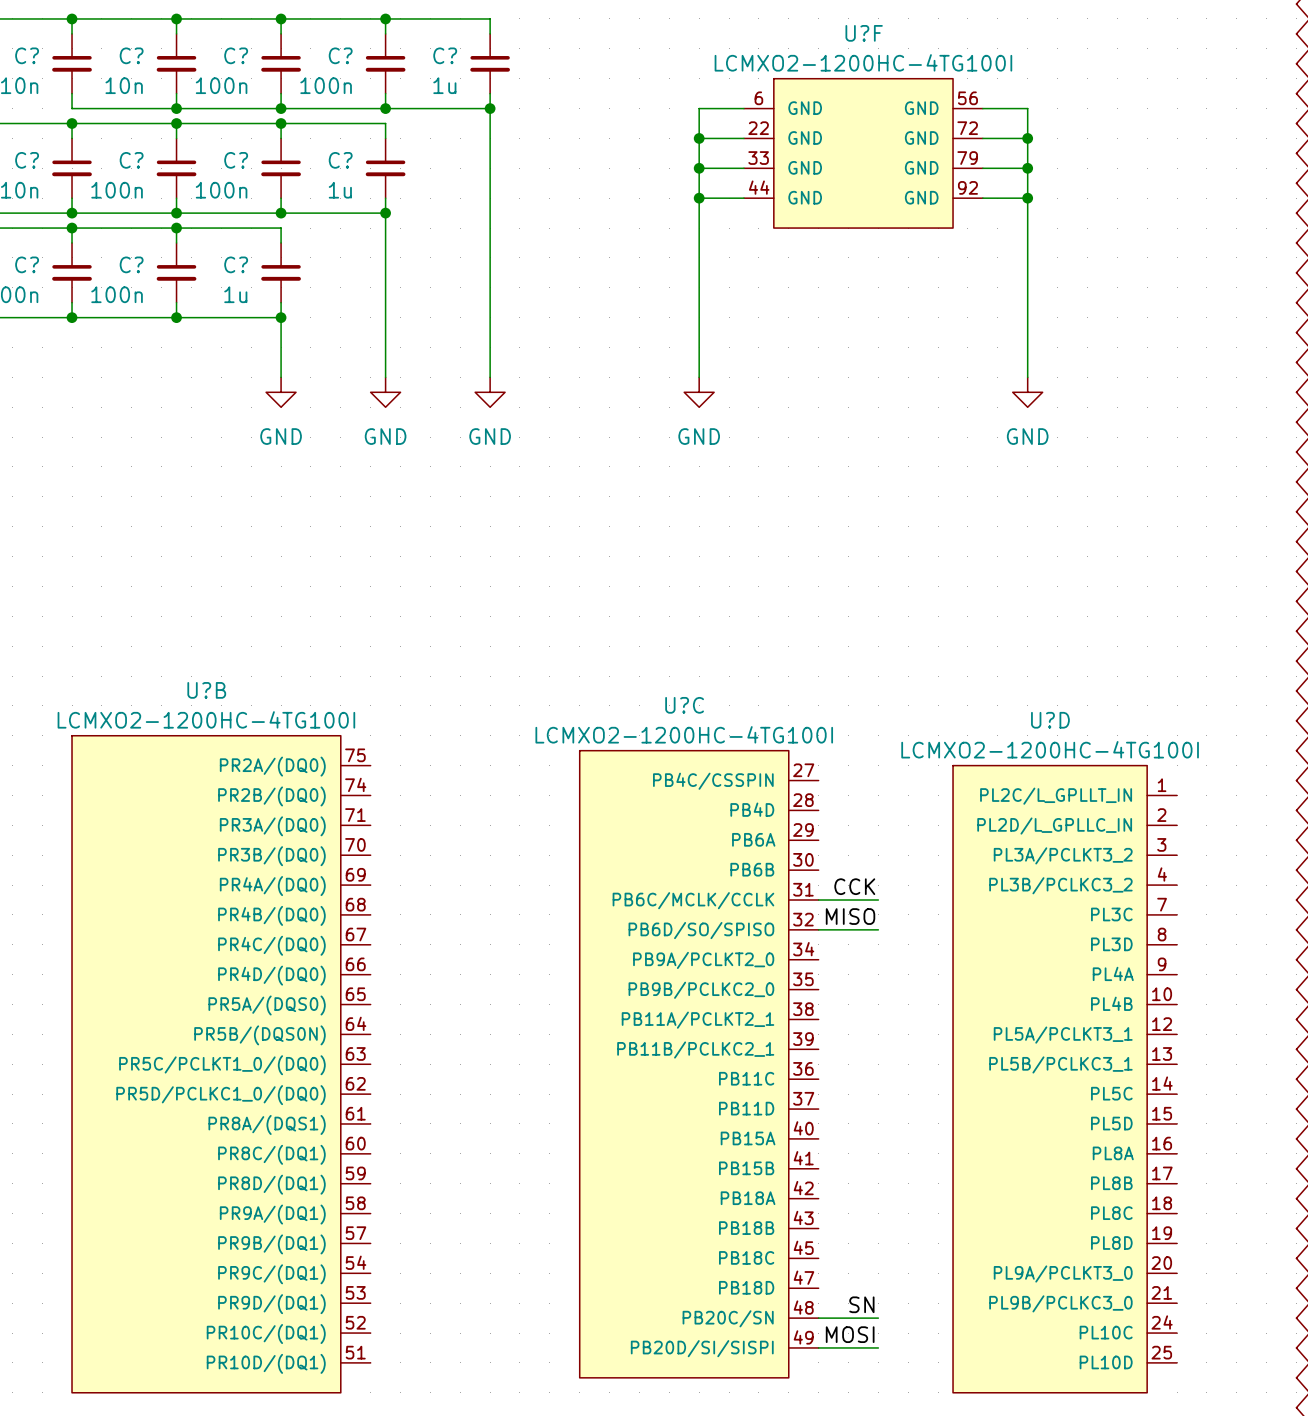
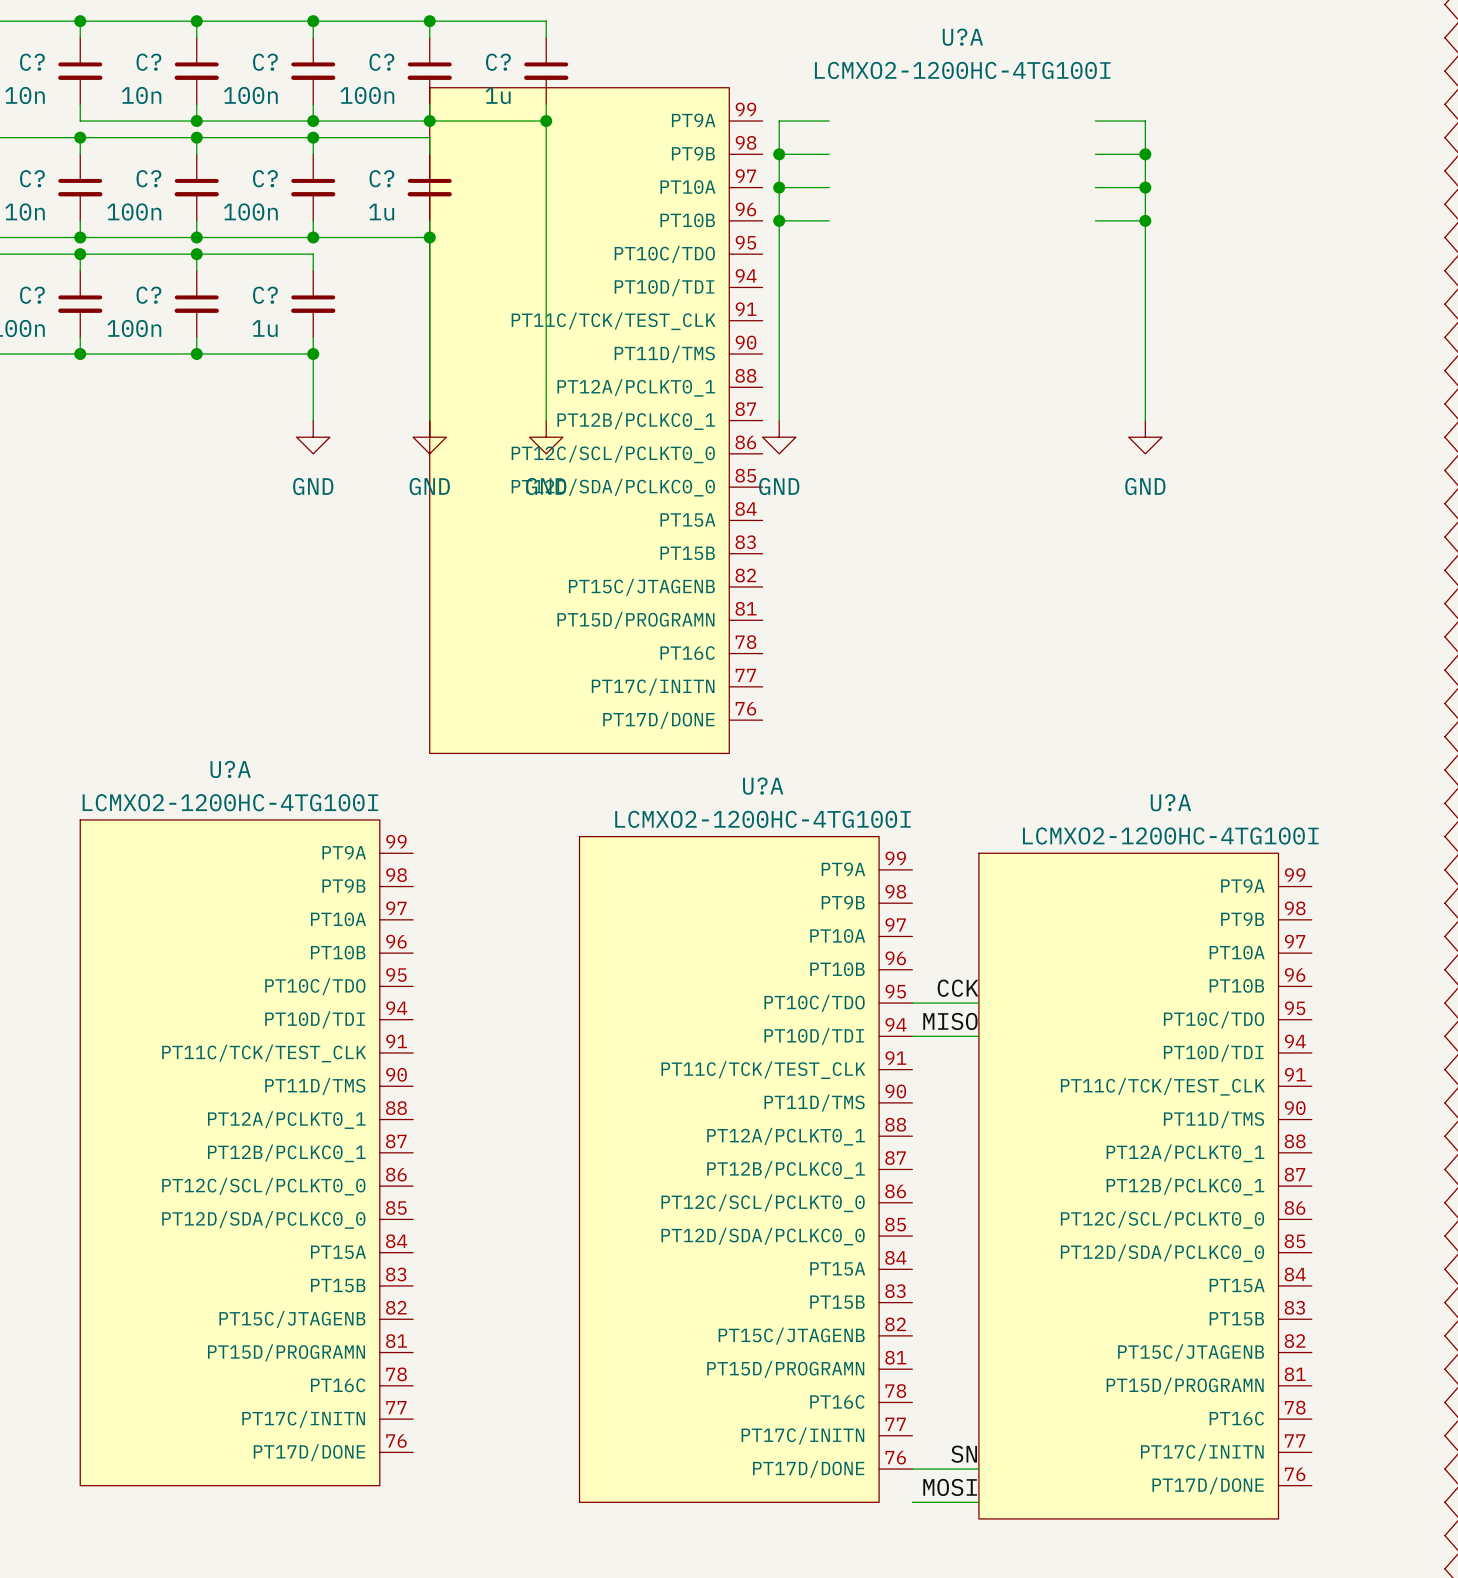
U?F: LCMXO2-1200HC-4TG100I (863, 153) -> none
U?A: none -> LCMXO2-1200HC-4TG100I (596, 420)
U?A: none -> LCMXO2-1200HC-4TG100I (246, 1152)
U?A: none -> LCMXO2-1200HC-4TG100I (745, 1169)
U?B: LCMXO2-1200HC-4TG100I (221, 1064) -> none
U?C: LCMXO2-1200HC-4TG100I (699, 1064) -> none
U?A: none -> LCMXO2-1200HC-4TG100I (1145, 1186)
U?D: LCMXO2-1200HC-4TG100I (1065, 1079) -> none

